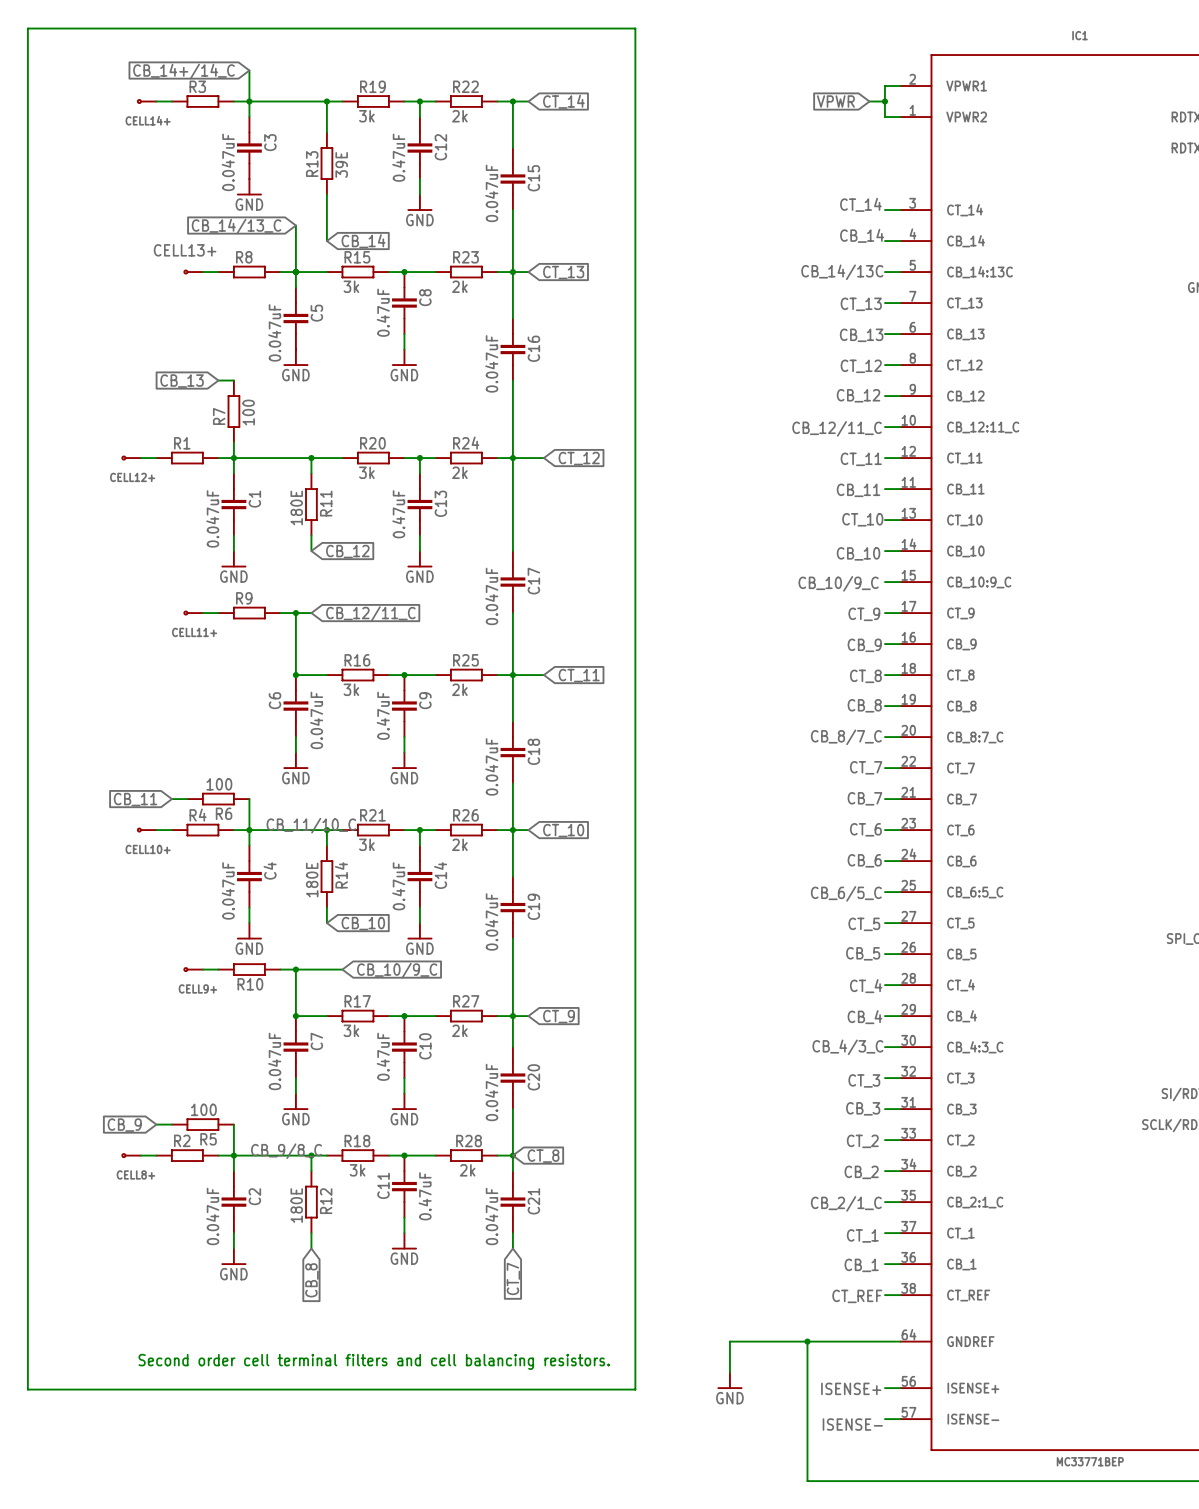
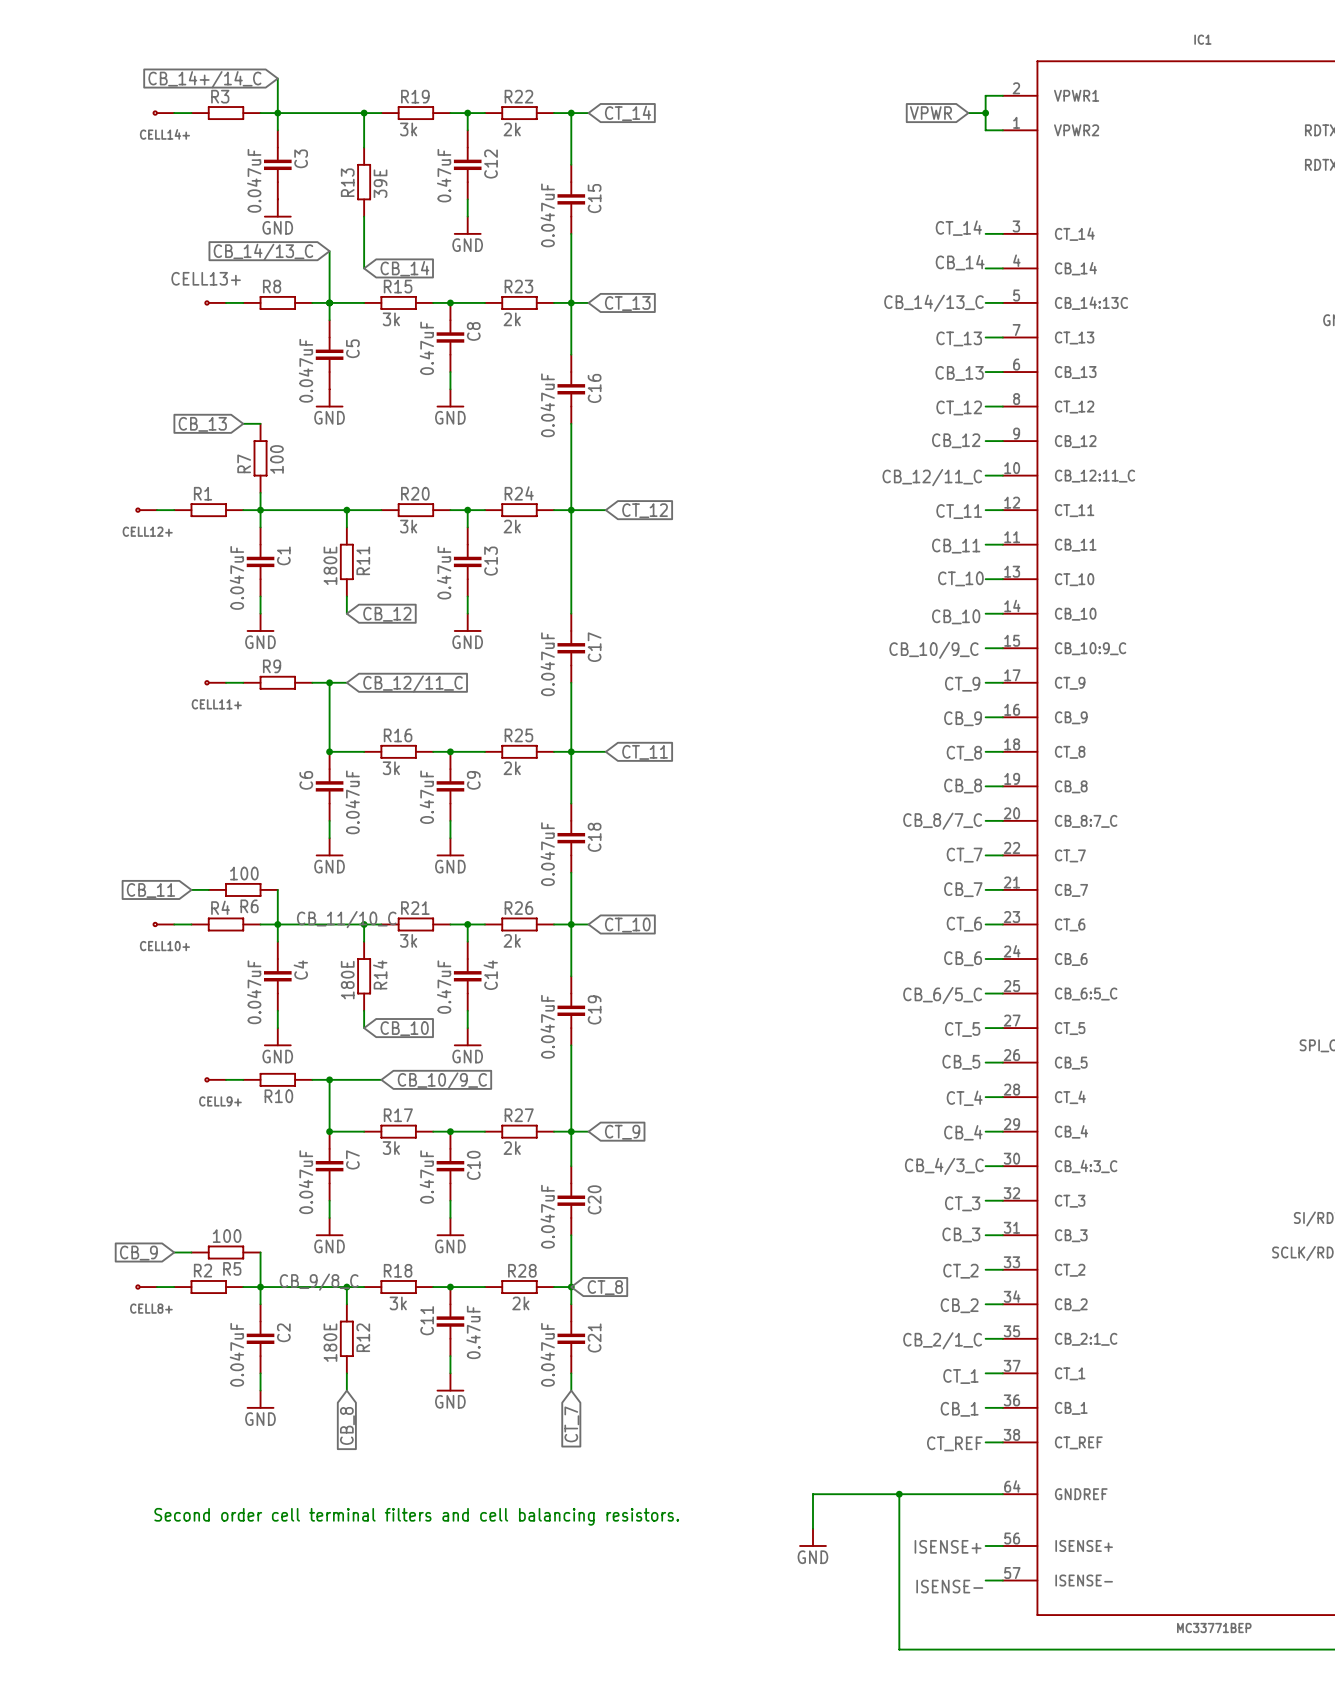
wire: (27, 28) (635, 28) (635, 1389) (27, 1389) (27, 28) -> none
label: CB_14/13C (842, 272) -> CB_14/13_C (933, 303)

